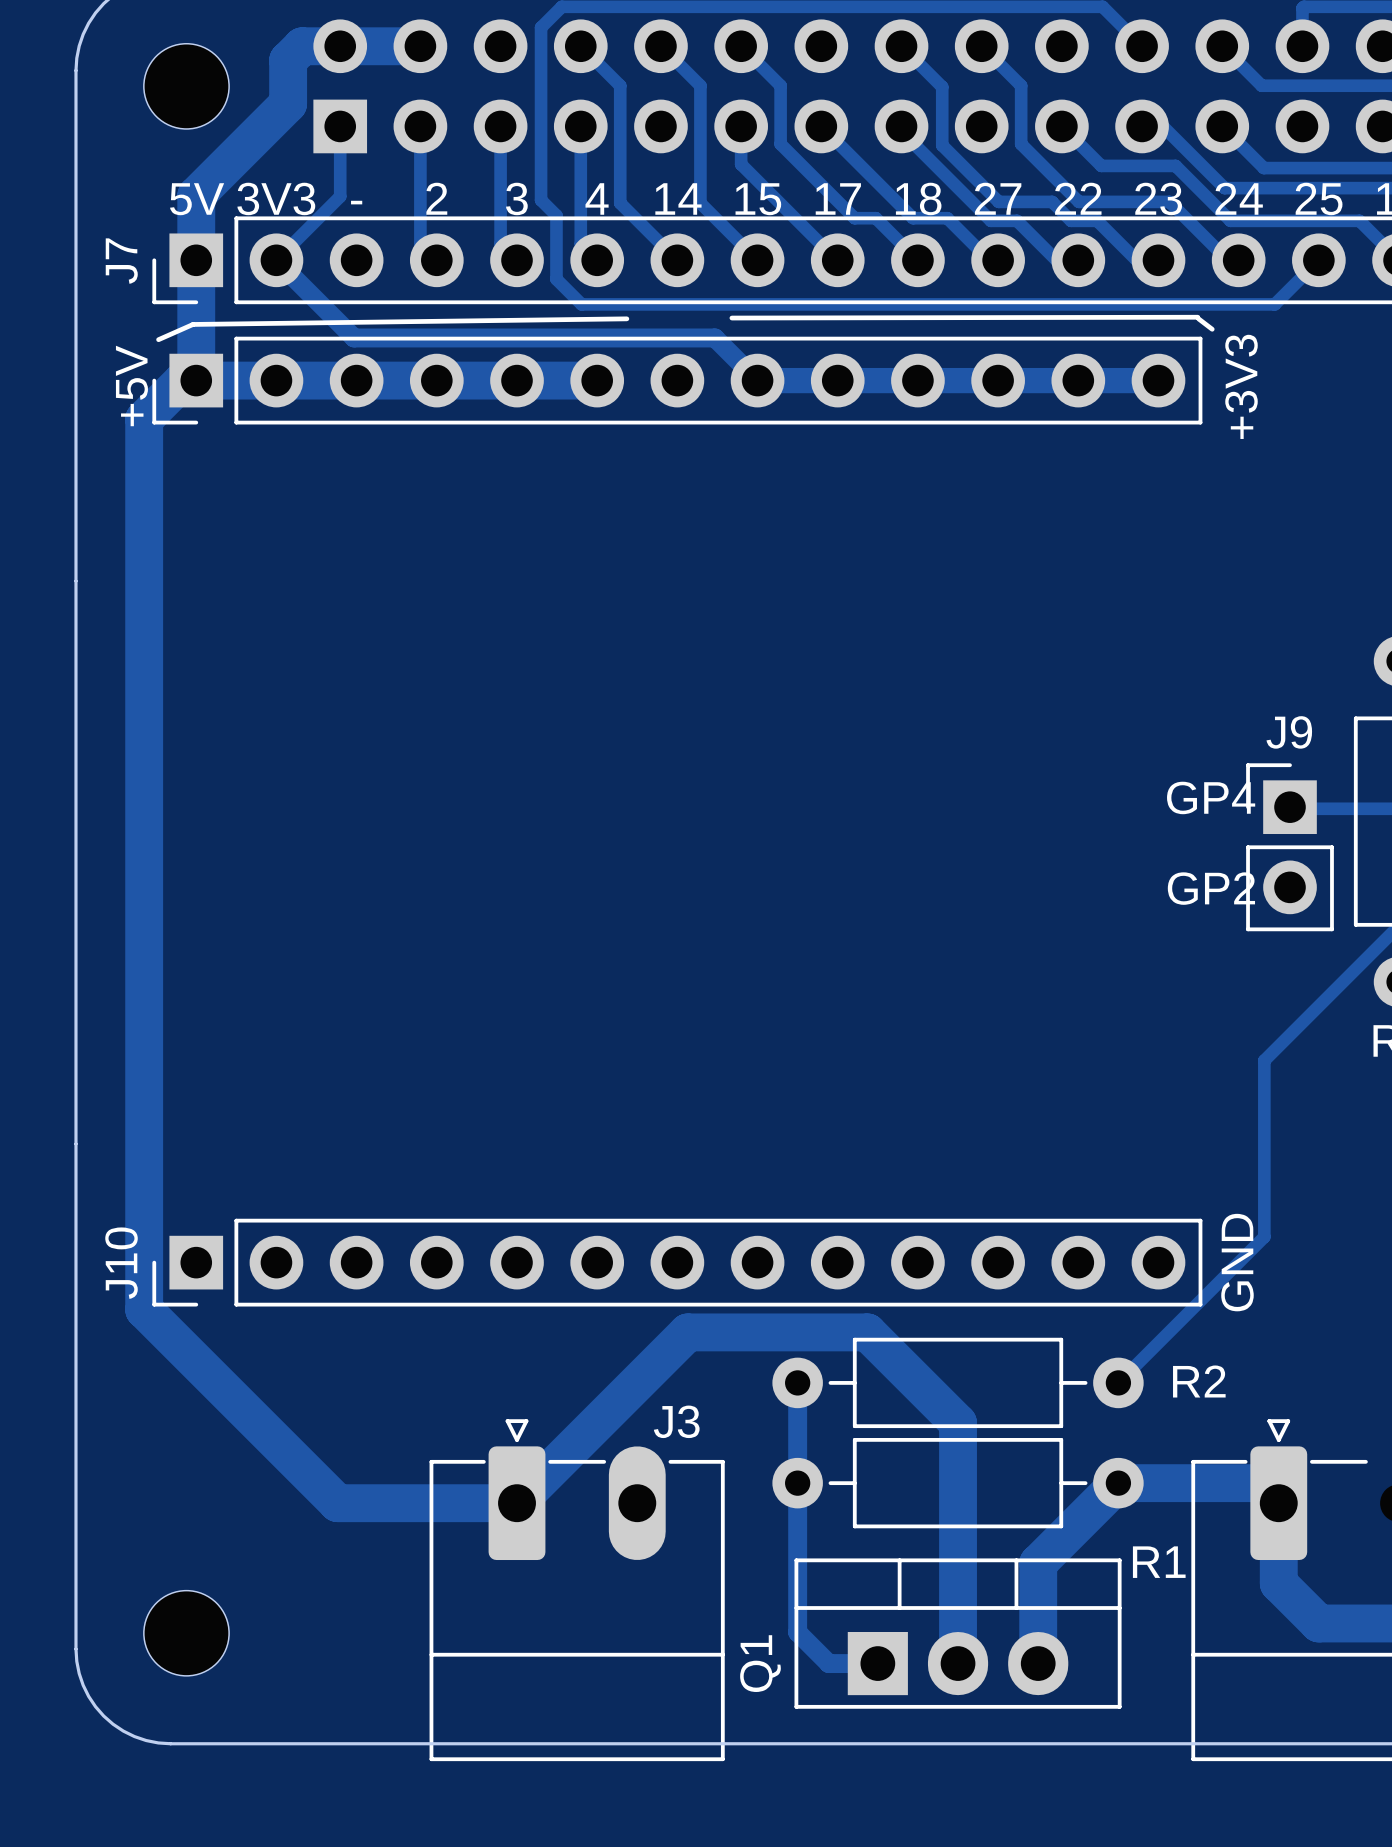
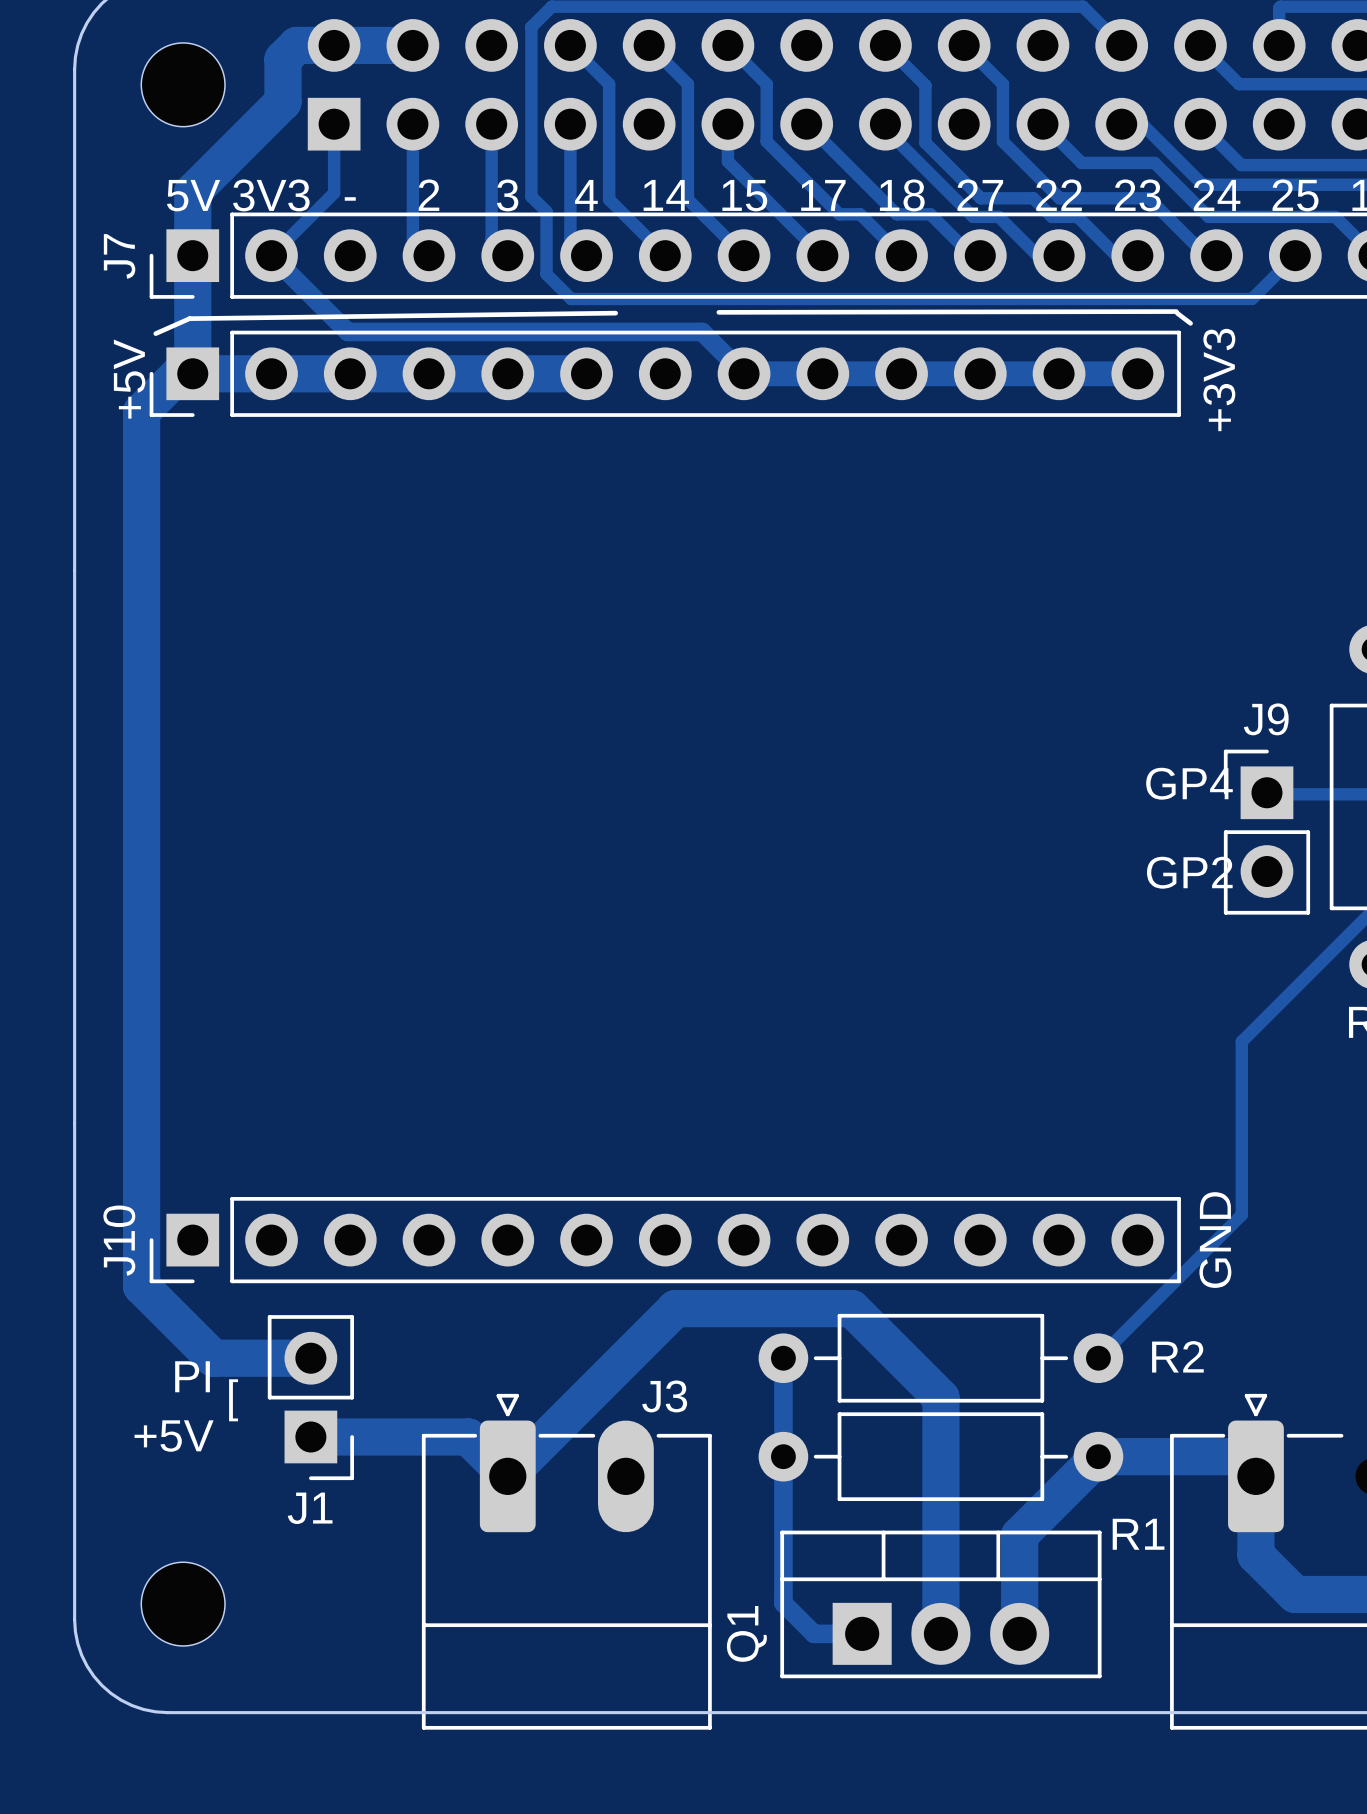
track: (217, 1382) (337, 1503) (517, 1503) -> (310, 1436) (468, 1436) (507, 1476)
track: none -> (213, 1358) (310, 1358)
text: none -> PI (192, 1376)
J1: none -> (310, 1397)
text: none -> [ (233, 1400)
text: none -> +5V (174, 1436)

